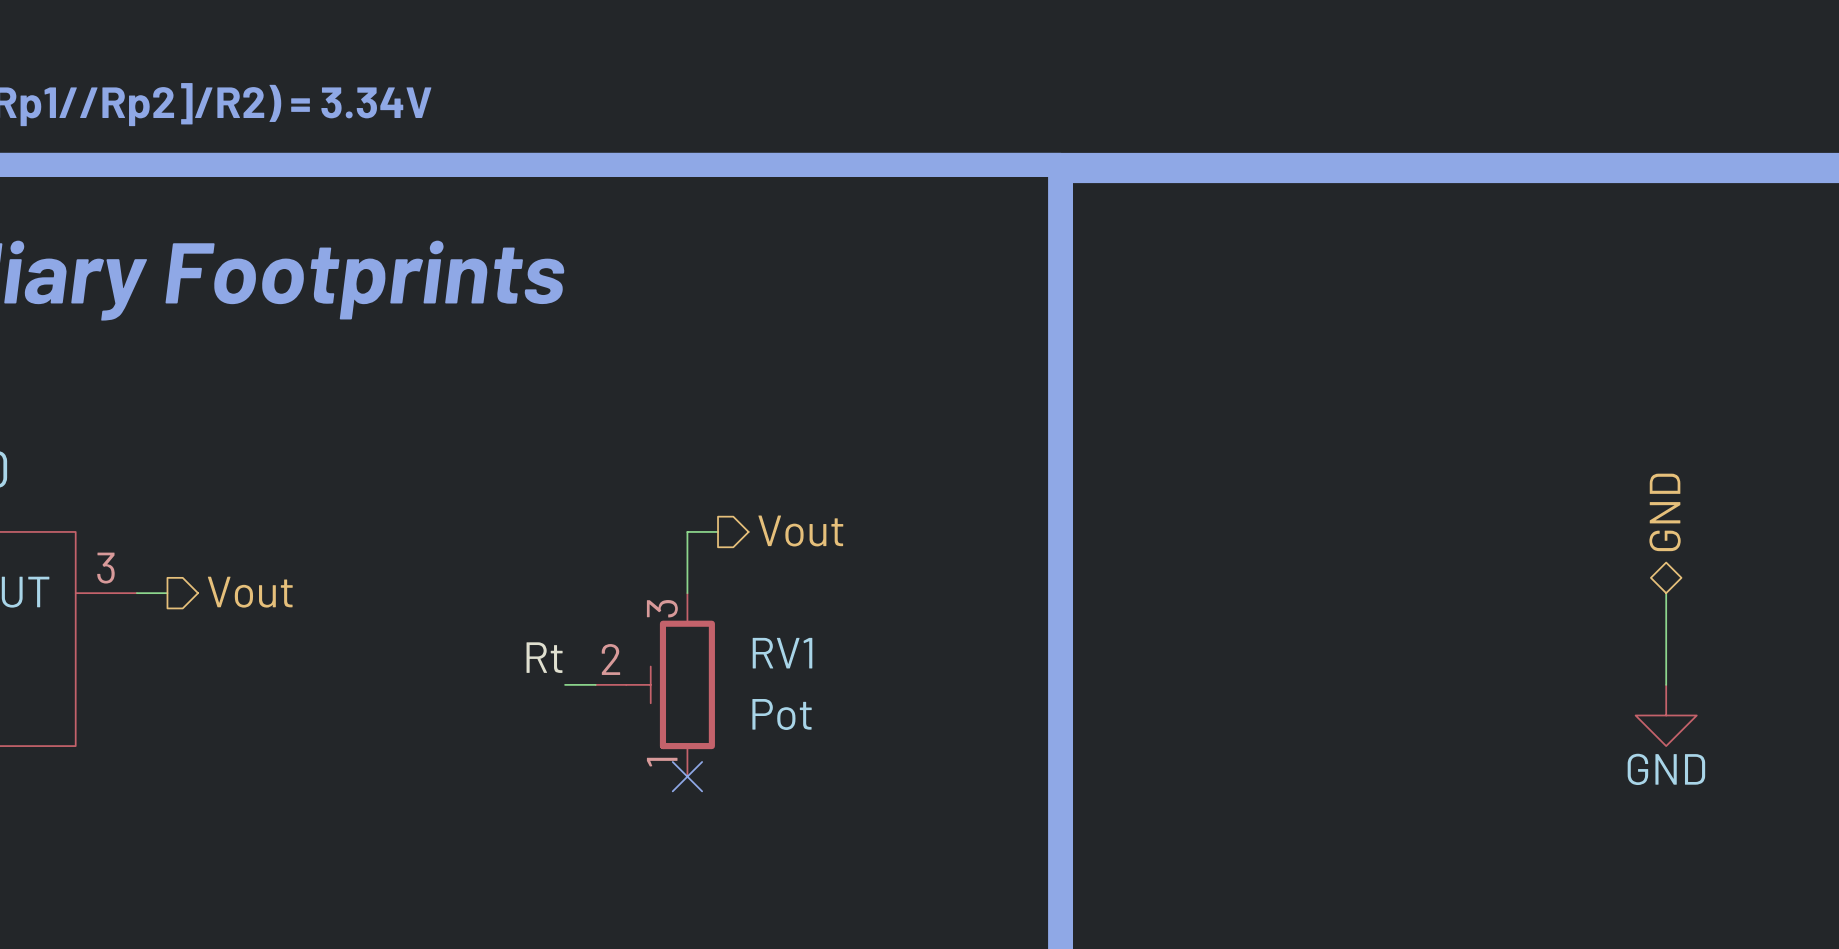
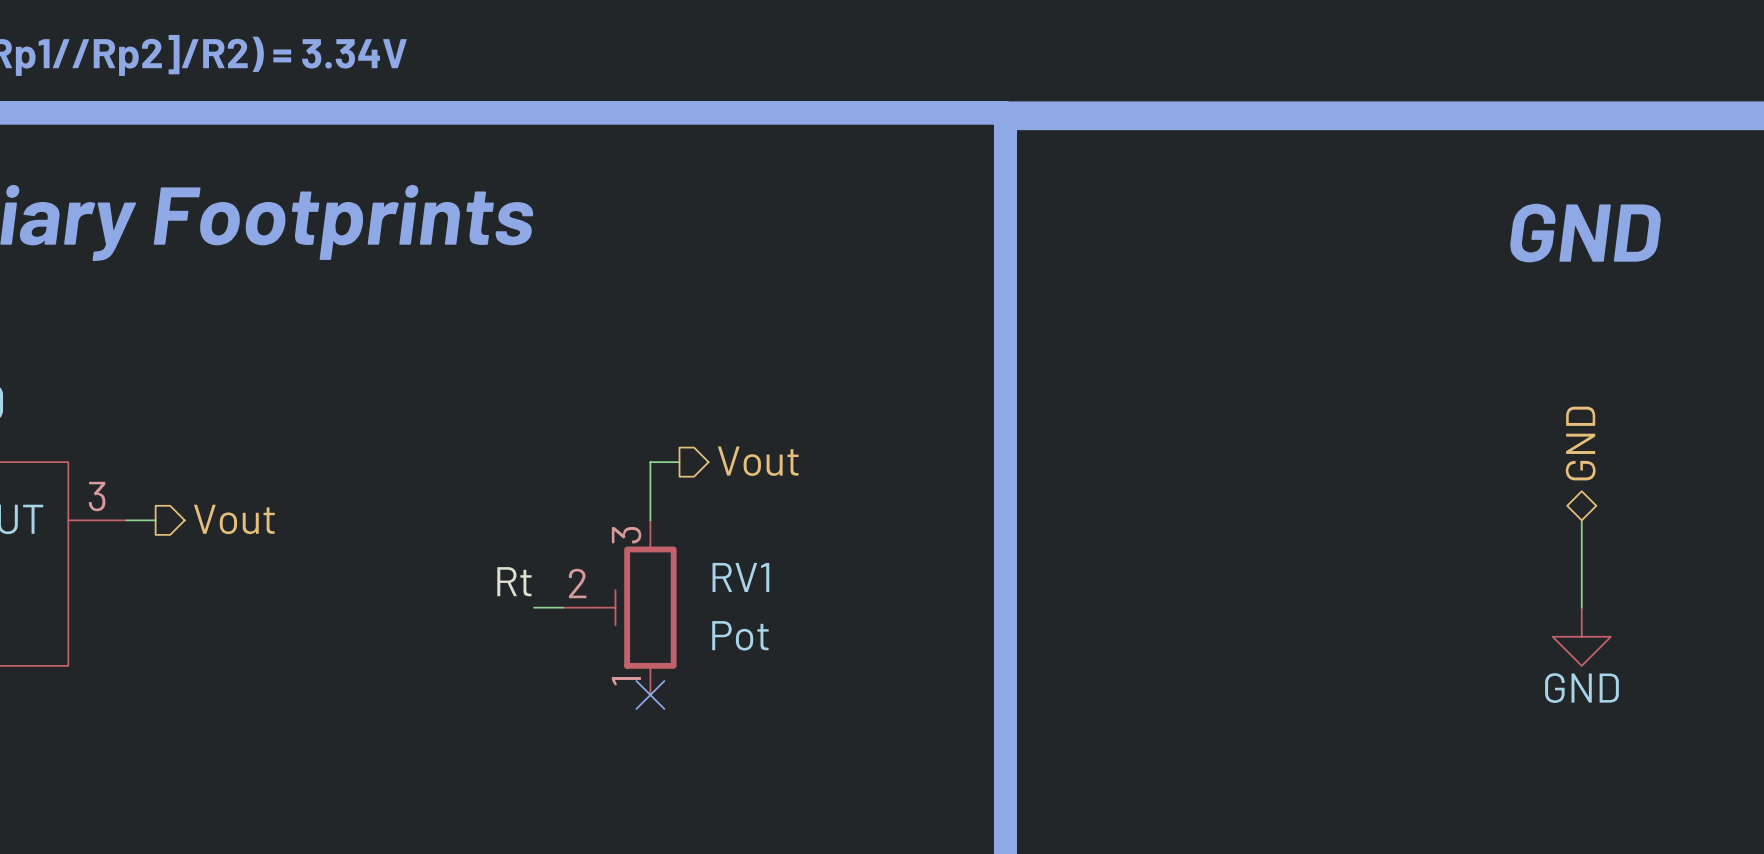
text: none -> GND (1585, 233)

